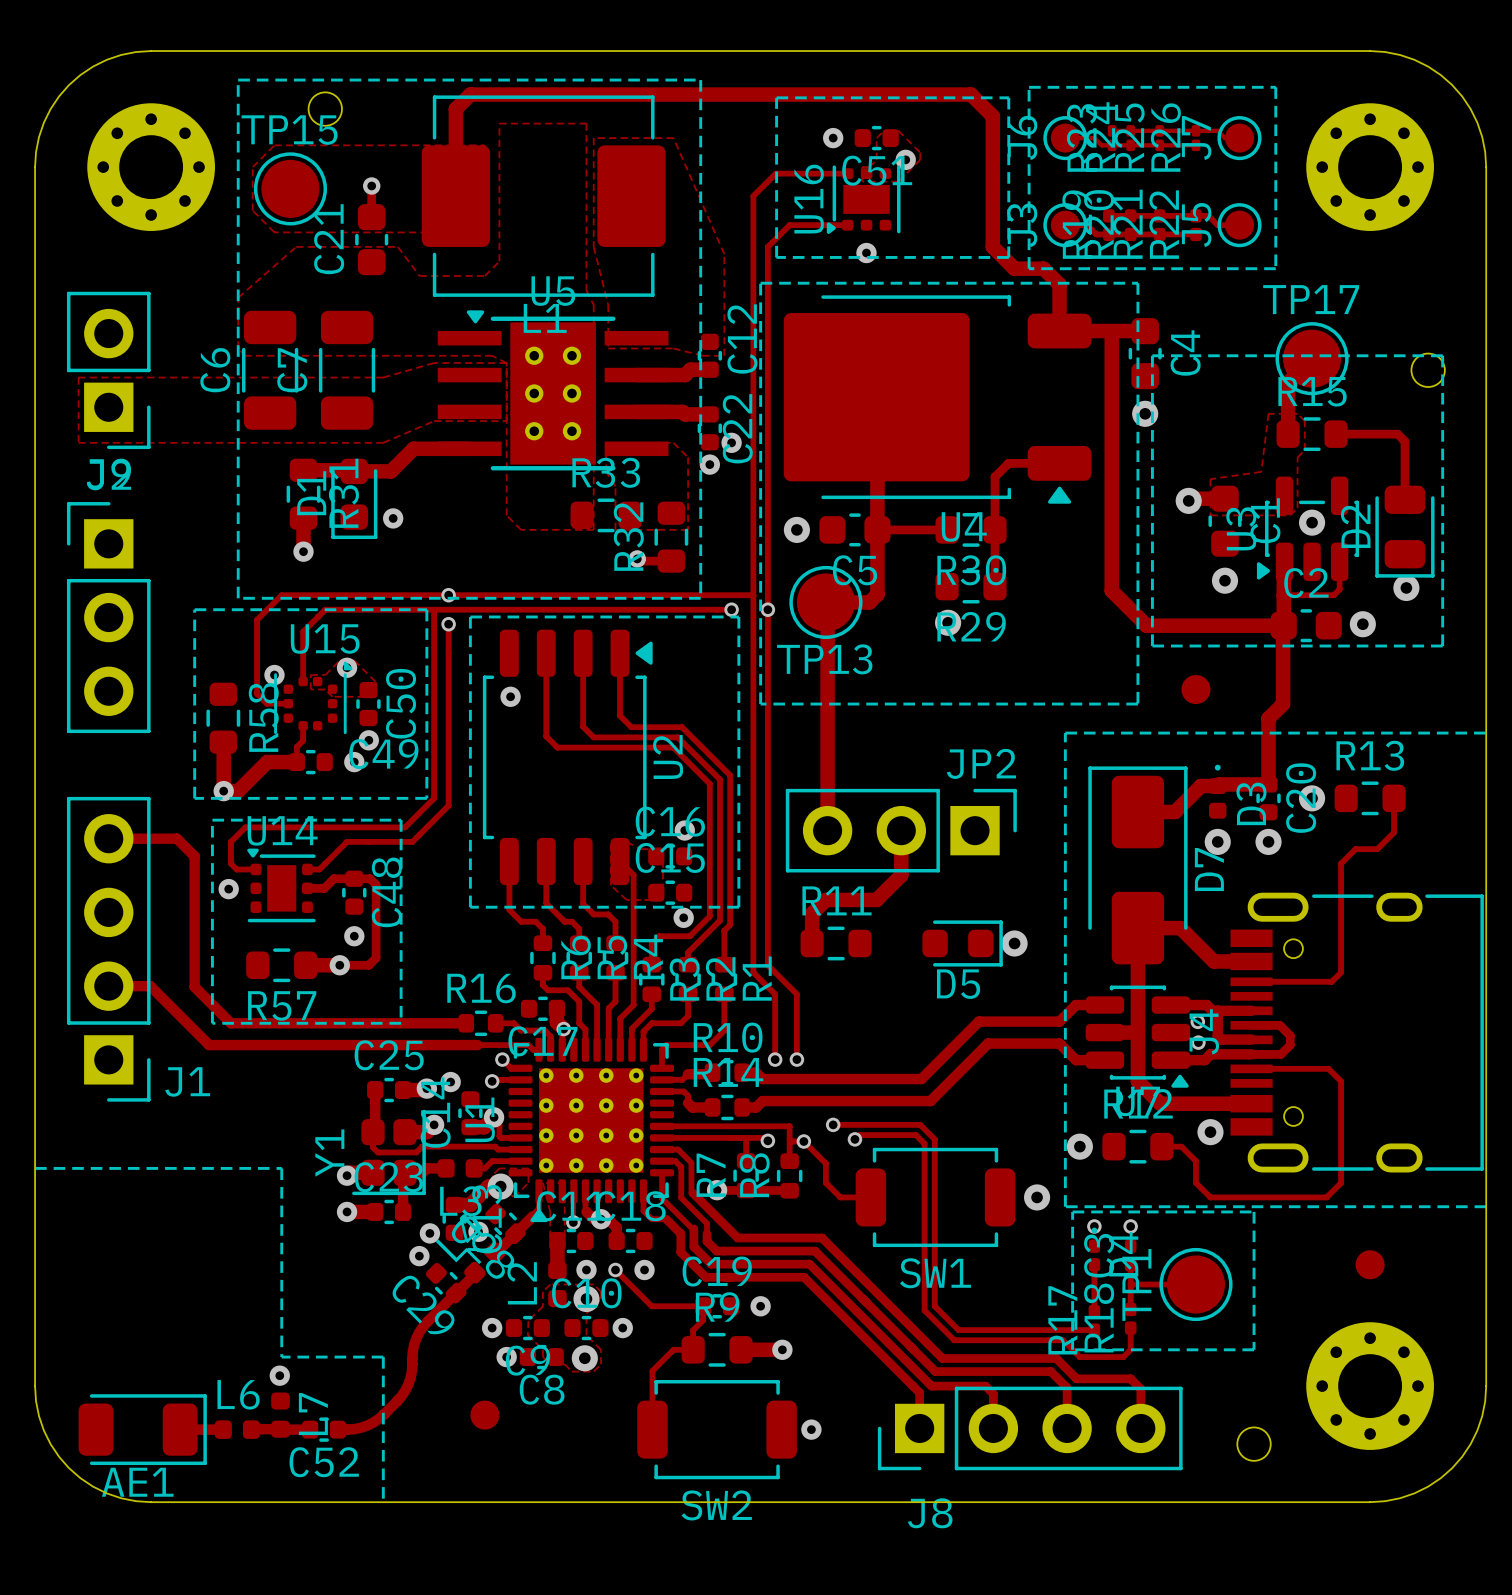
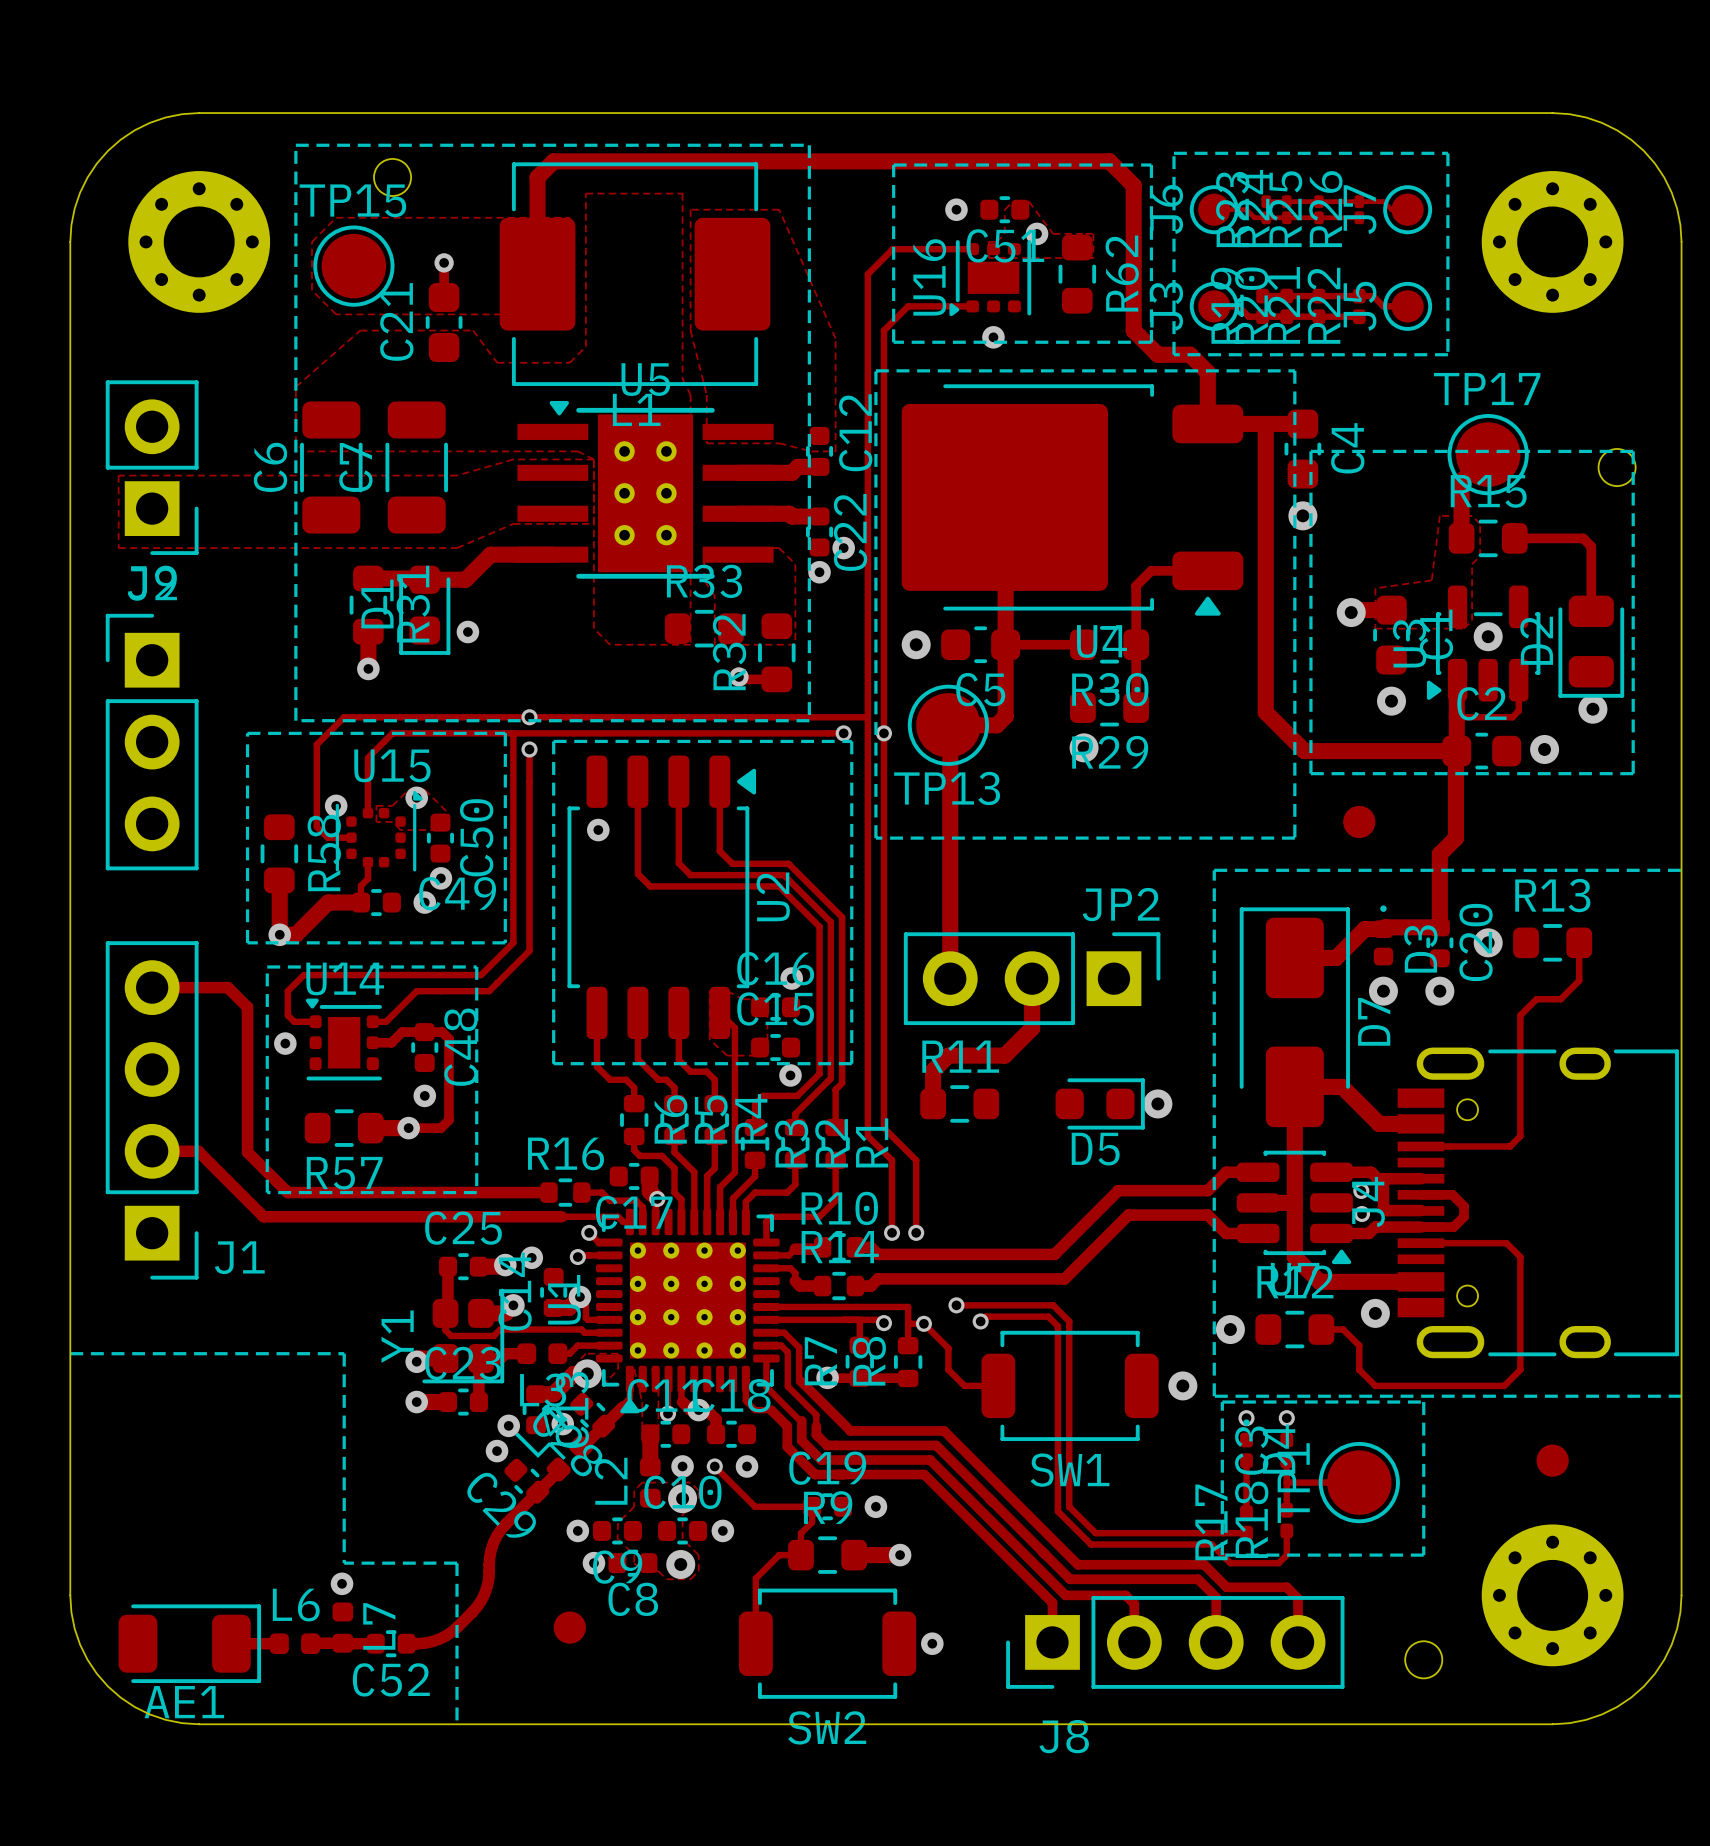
zone outline: (898, 130) (920, 152) (920, 159) (898, 181) -> (1028, 201) (1053, 233) (1093, 233) (1093, 258) (1028, 258)
R62: none -> (1077, 274)

